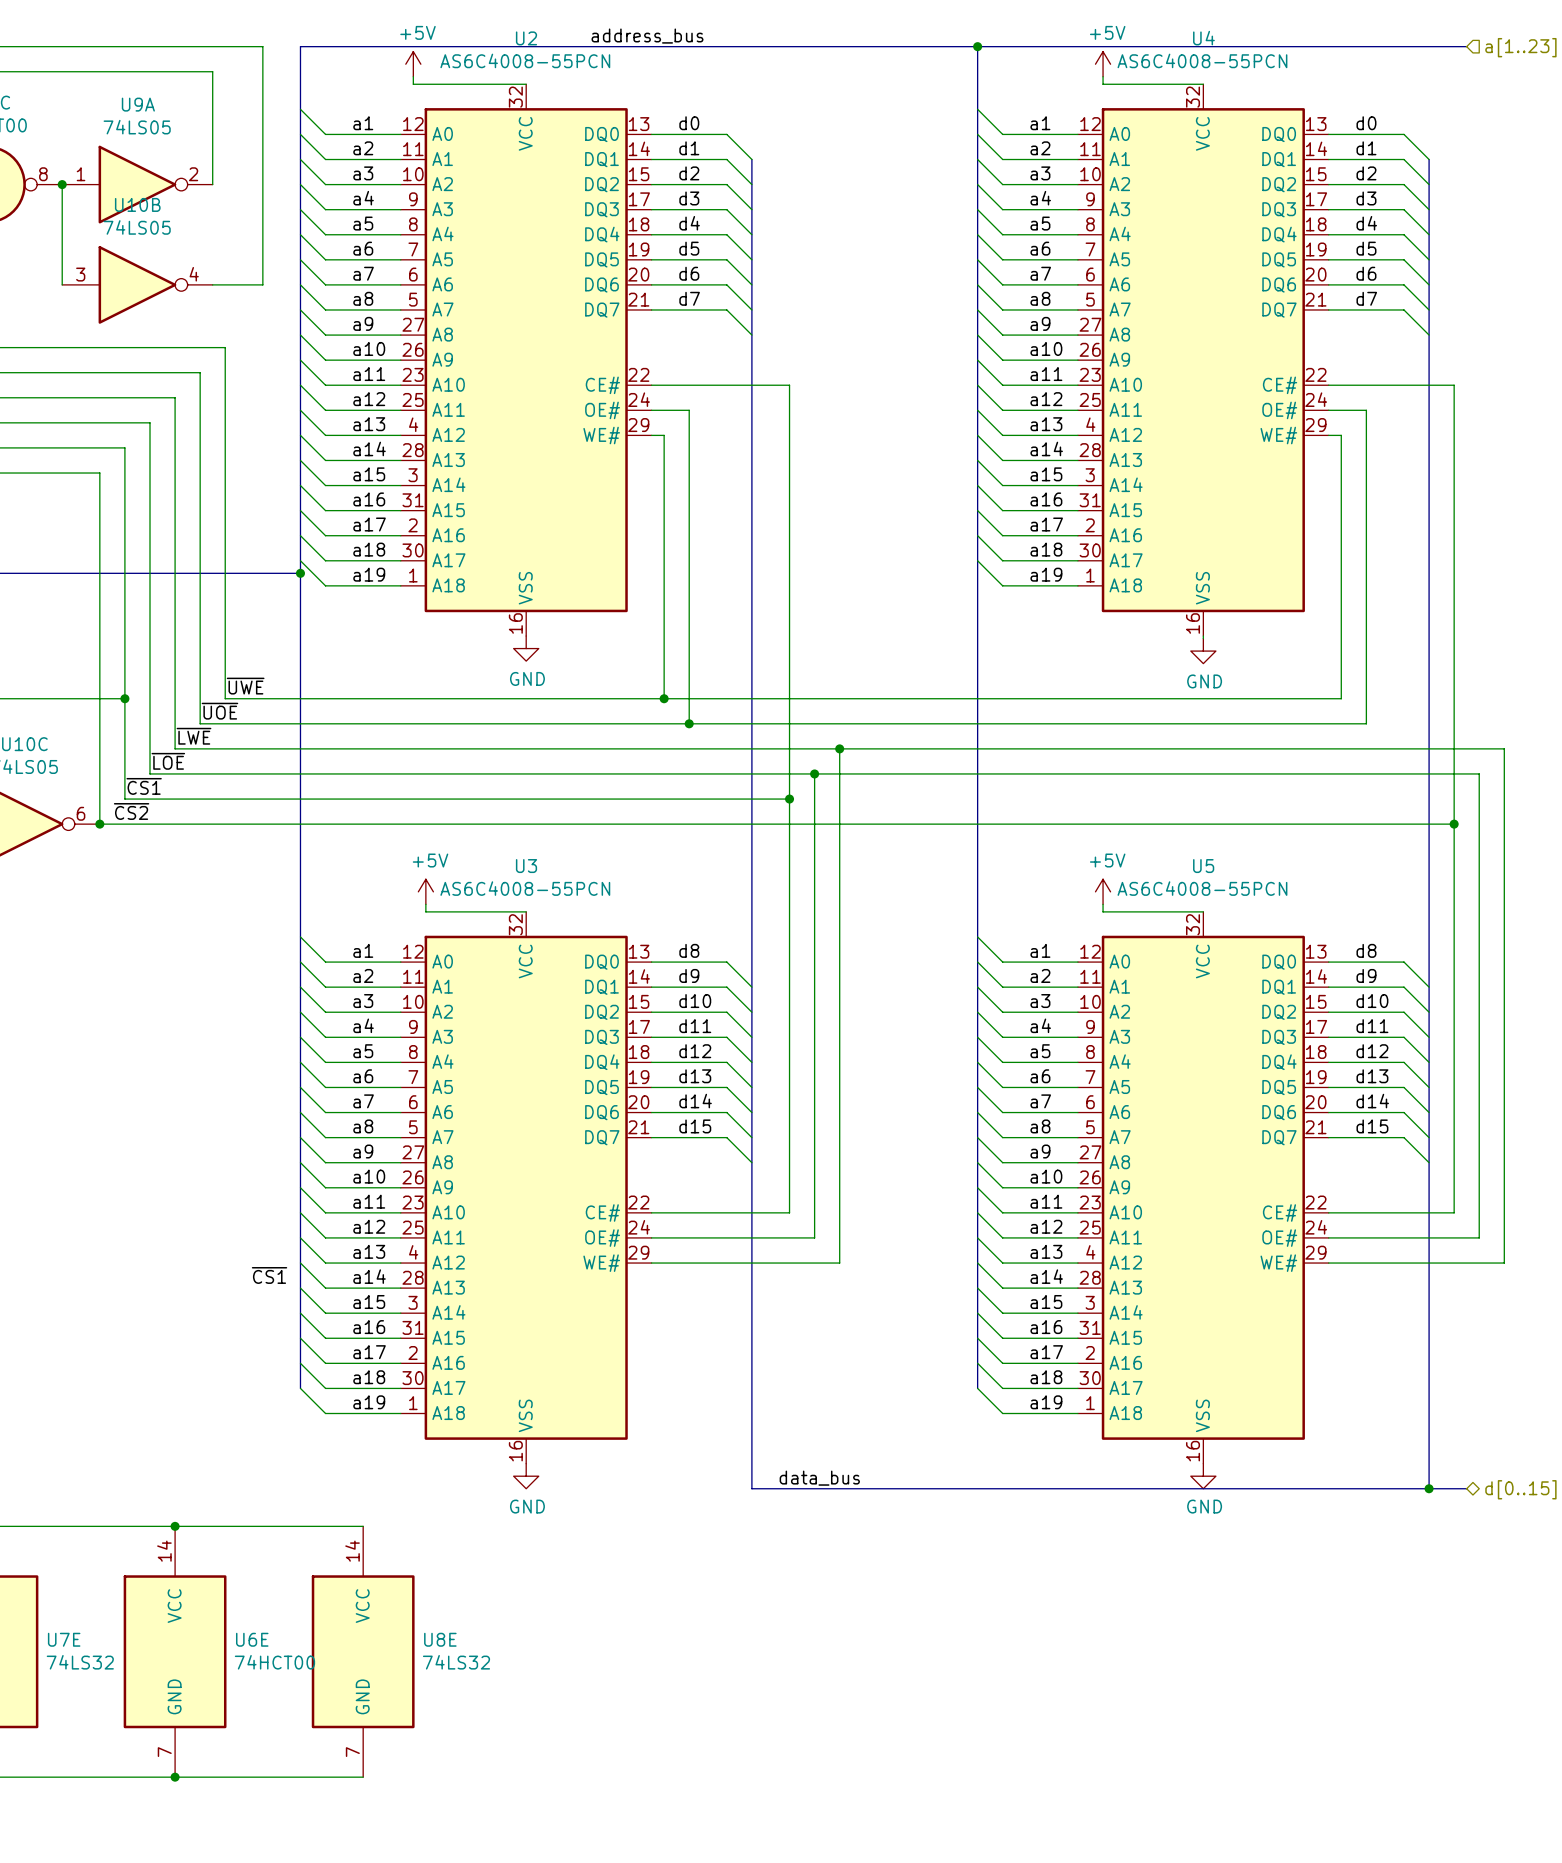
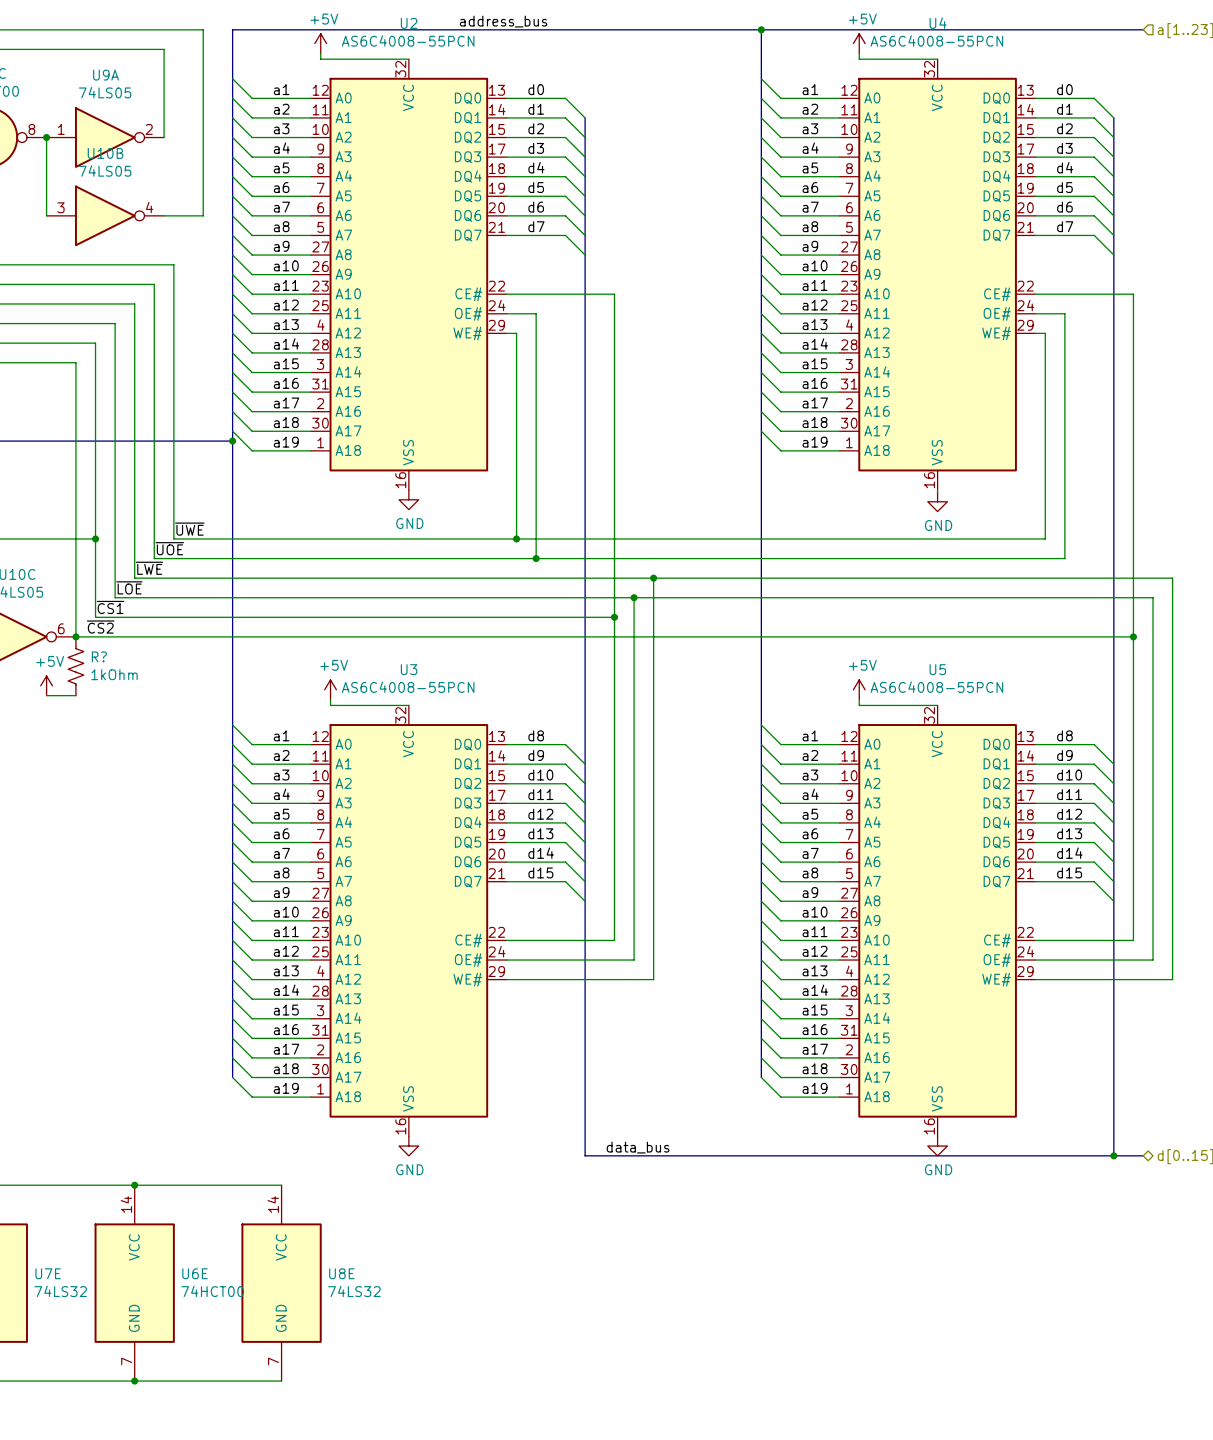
R?: none -> 1kOhm (75, 666)
power symbol: none -> +5V (46, 685)
wire: none -> (46, 695) (75, 695)
label: ~{CS1} (269, 1275) -> none

